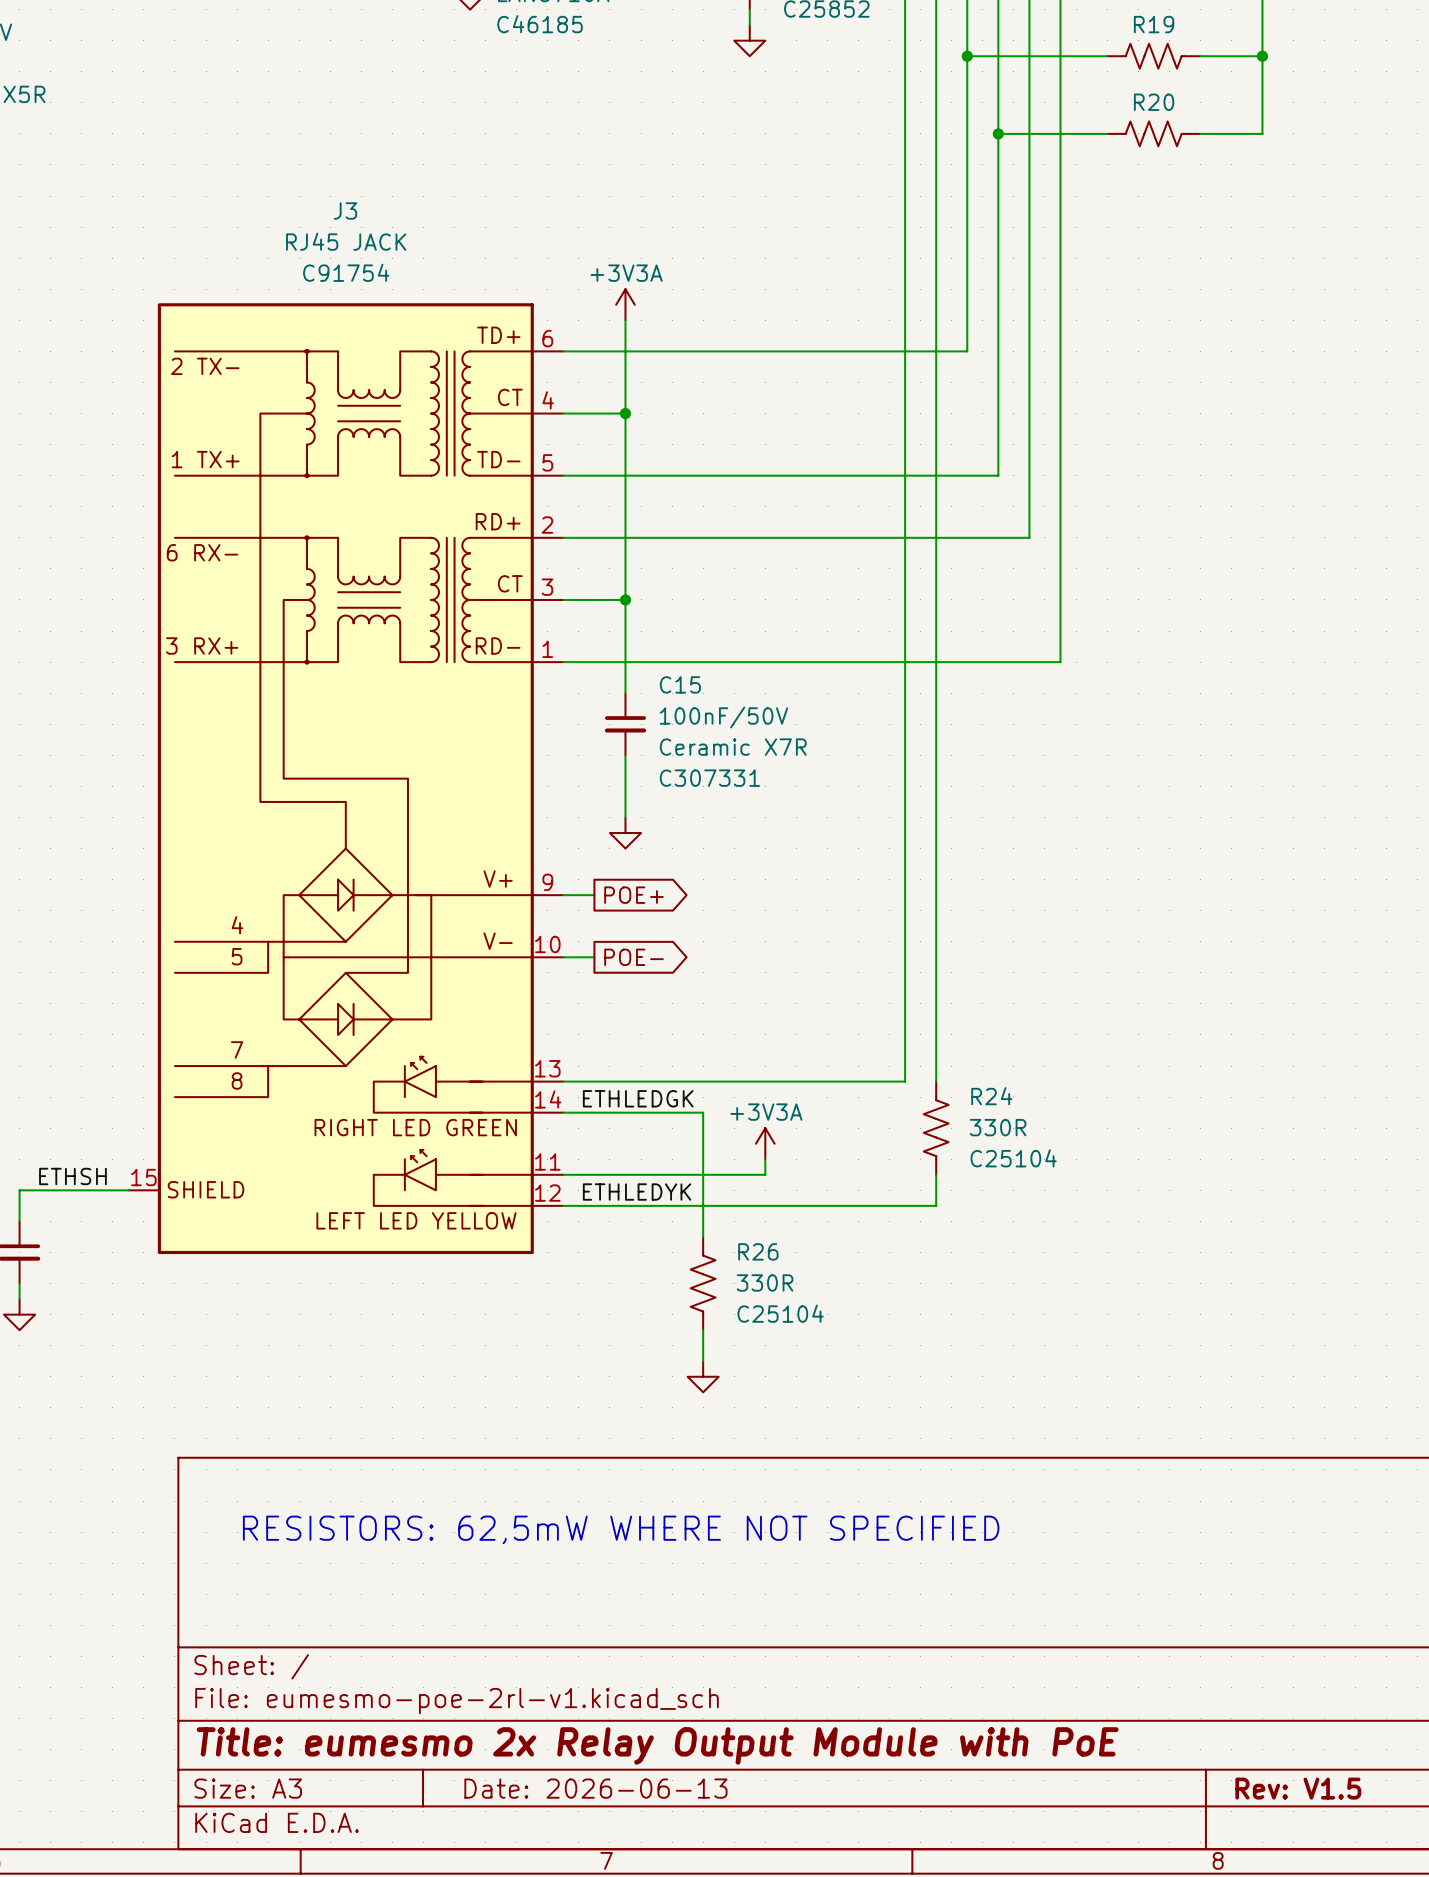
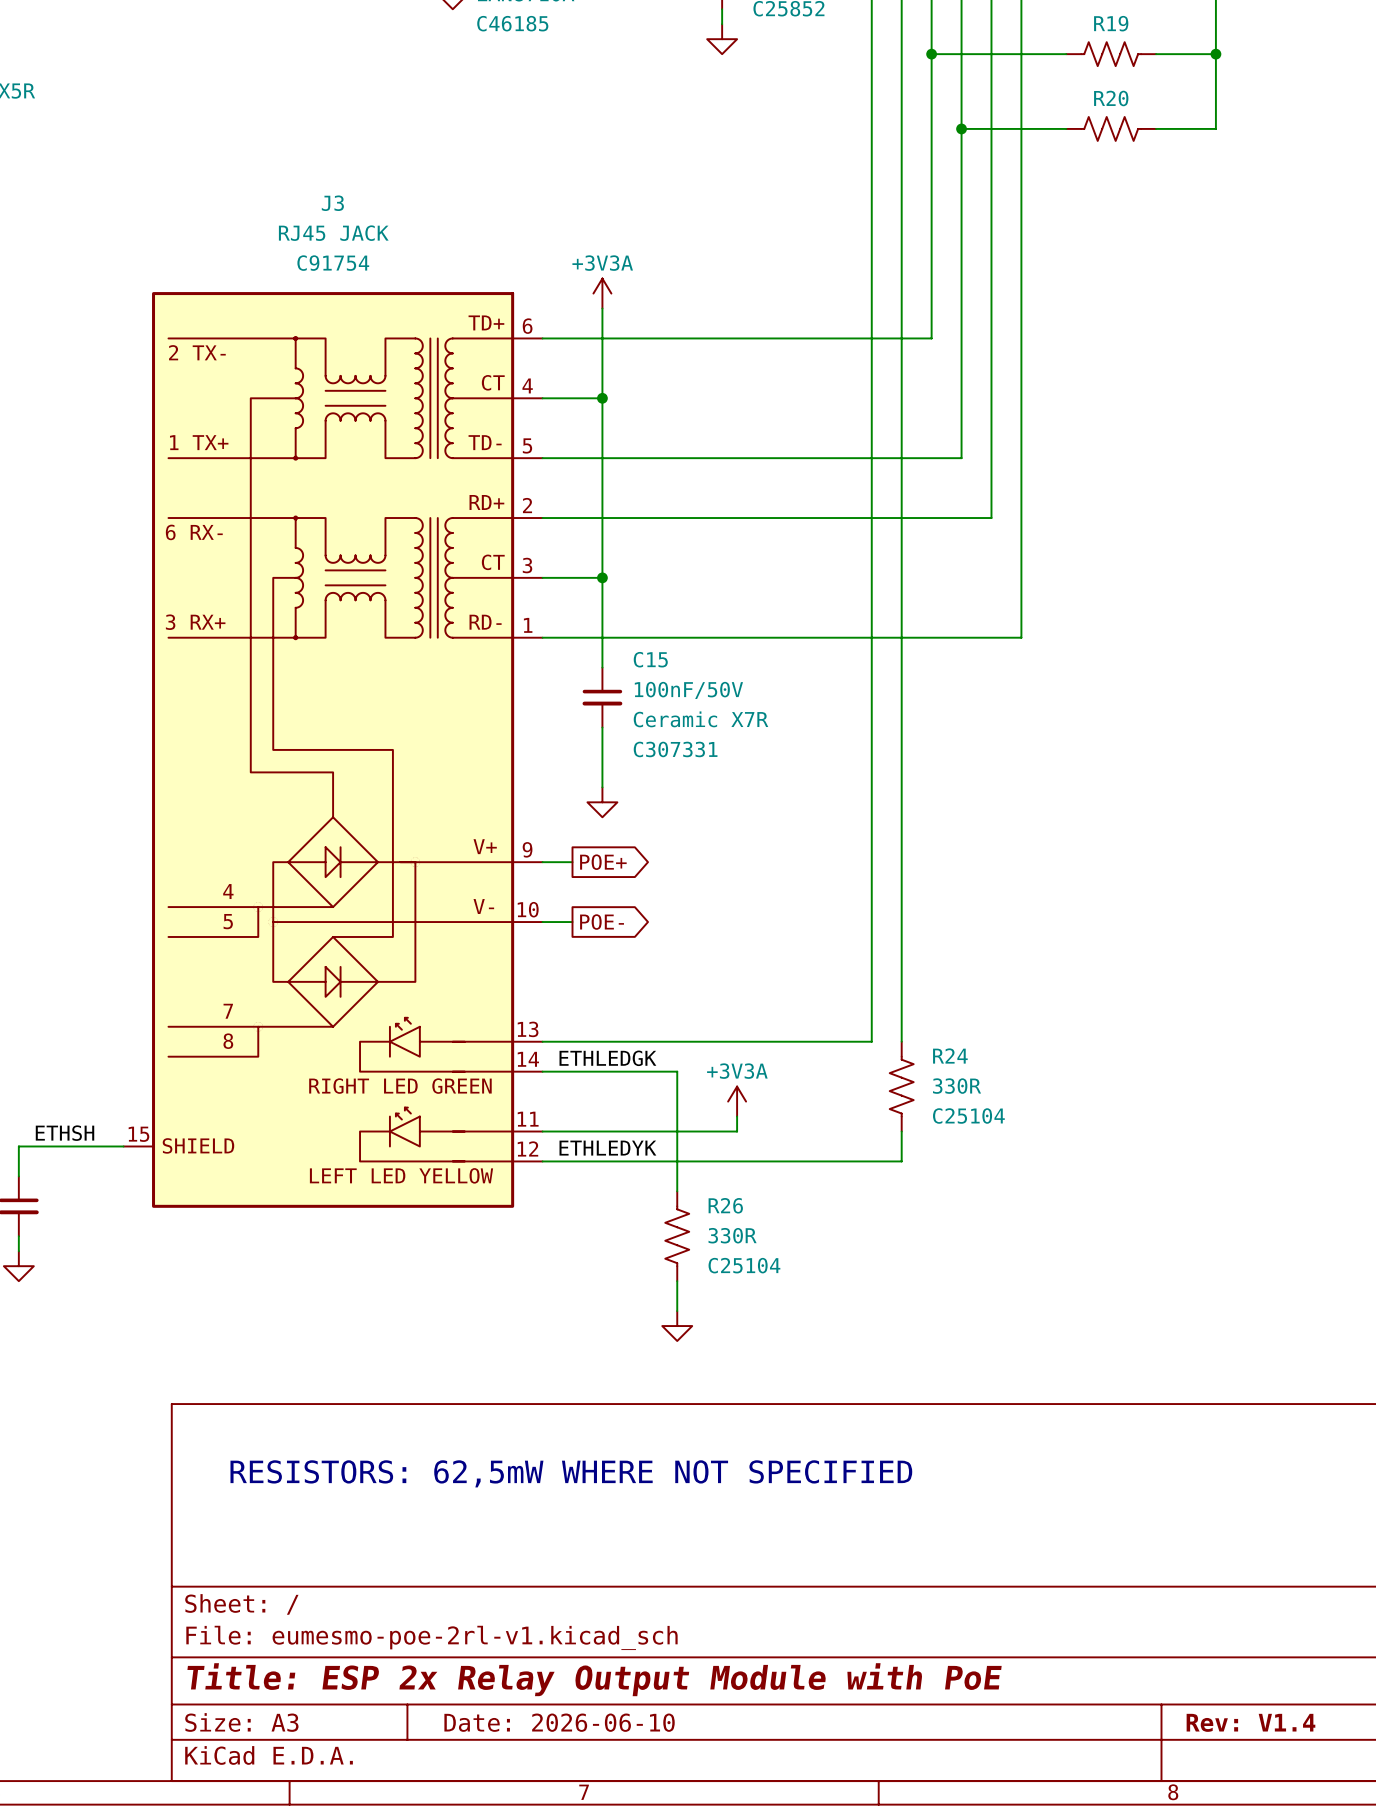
title block: Title: eumesmo 2x Relay Output Module with PoE (657, 1745) -> Title: ESP 2x Relay Output Module with PoE (594, 1679)
title block: Date: 2026-06-13 (595, 1788) -> Date: 2026-06-10 (559, 1722)
title block: Rev: V1.5 (1298, 1788) -> Rev: V1.4 (1250, 1722)

